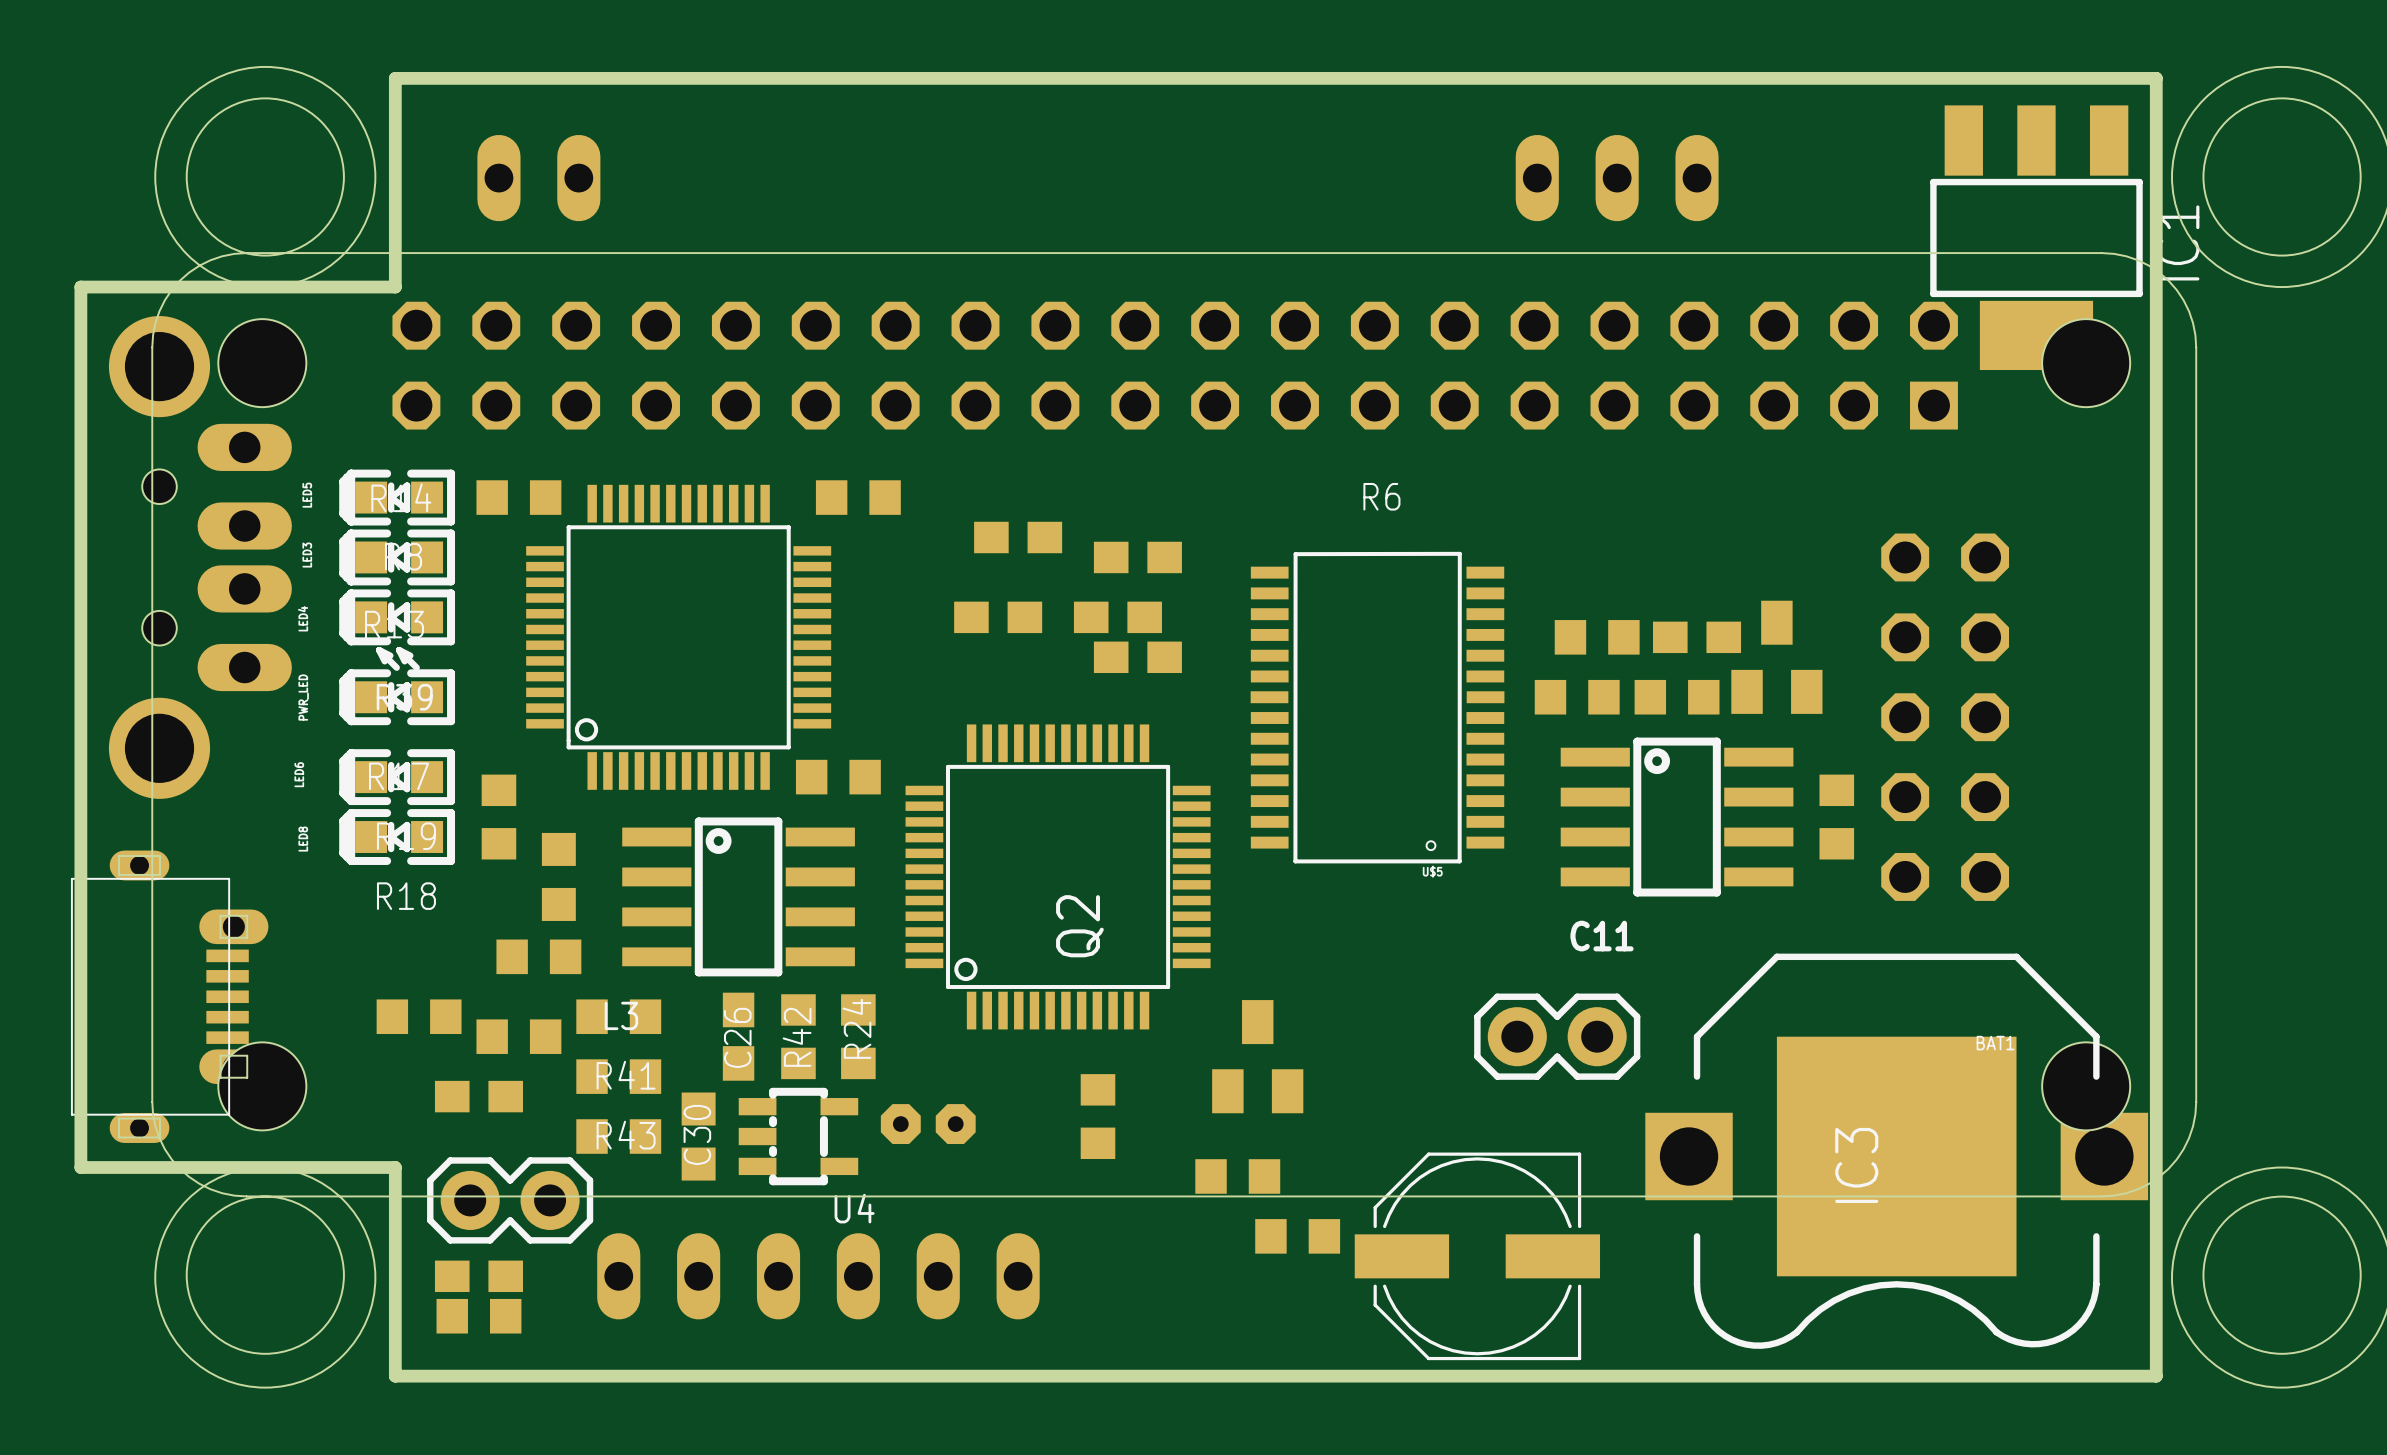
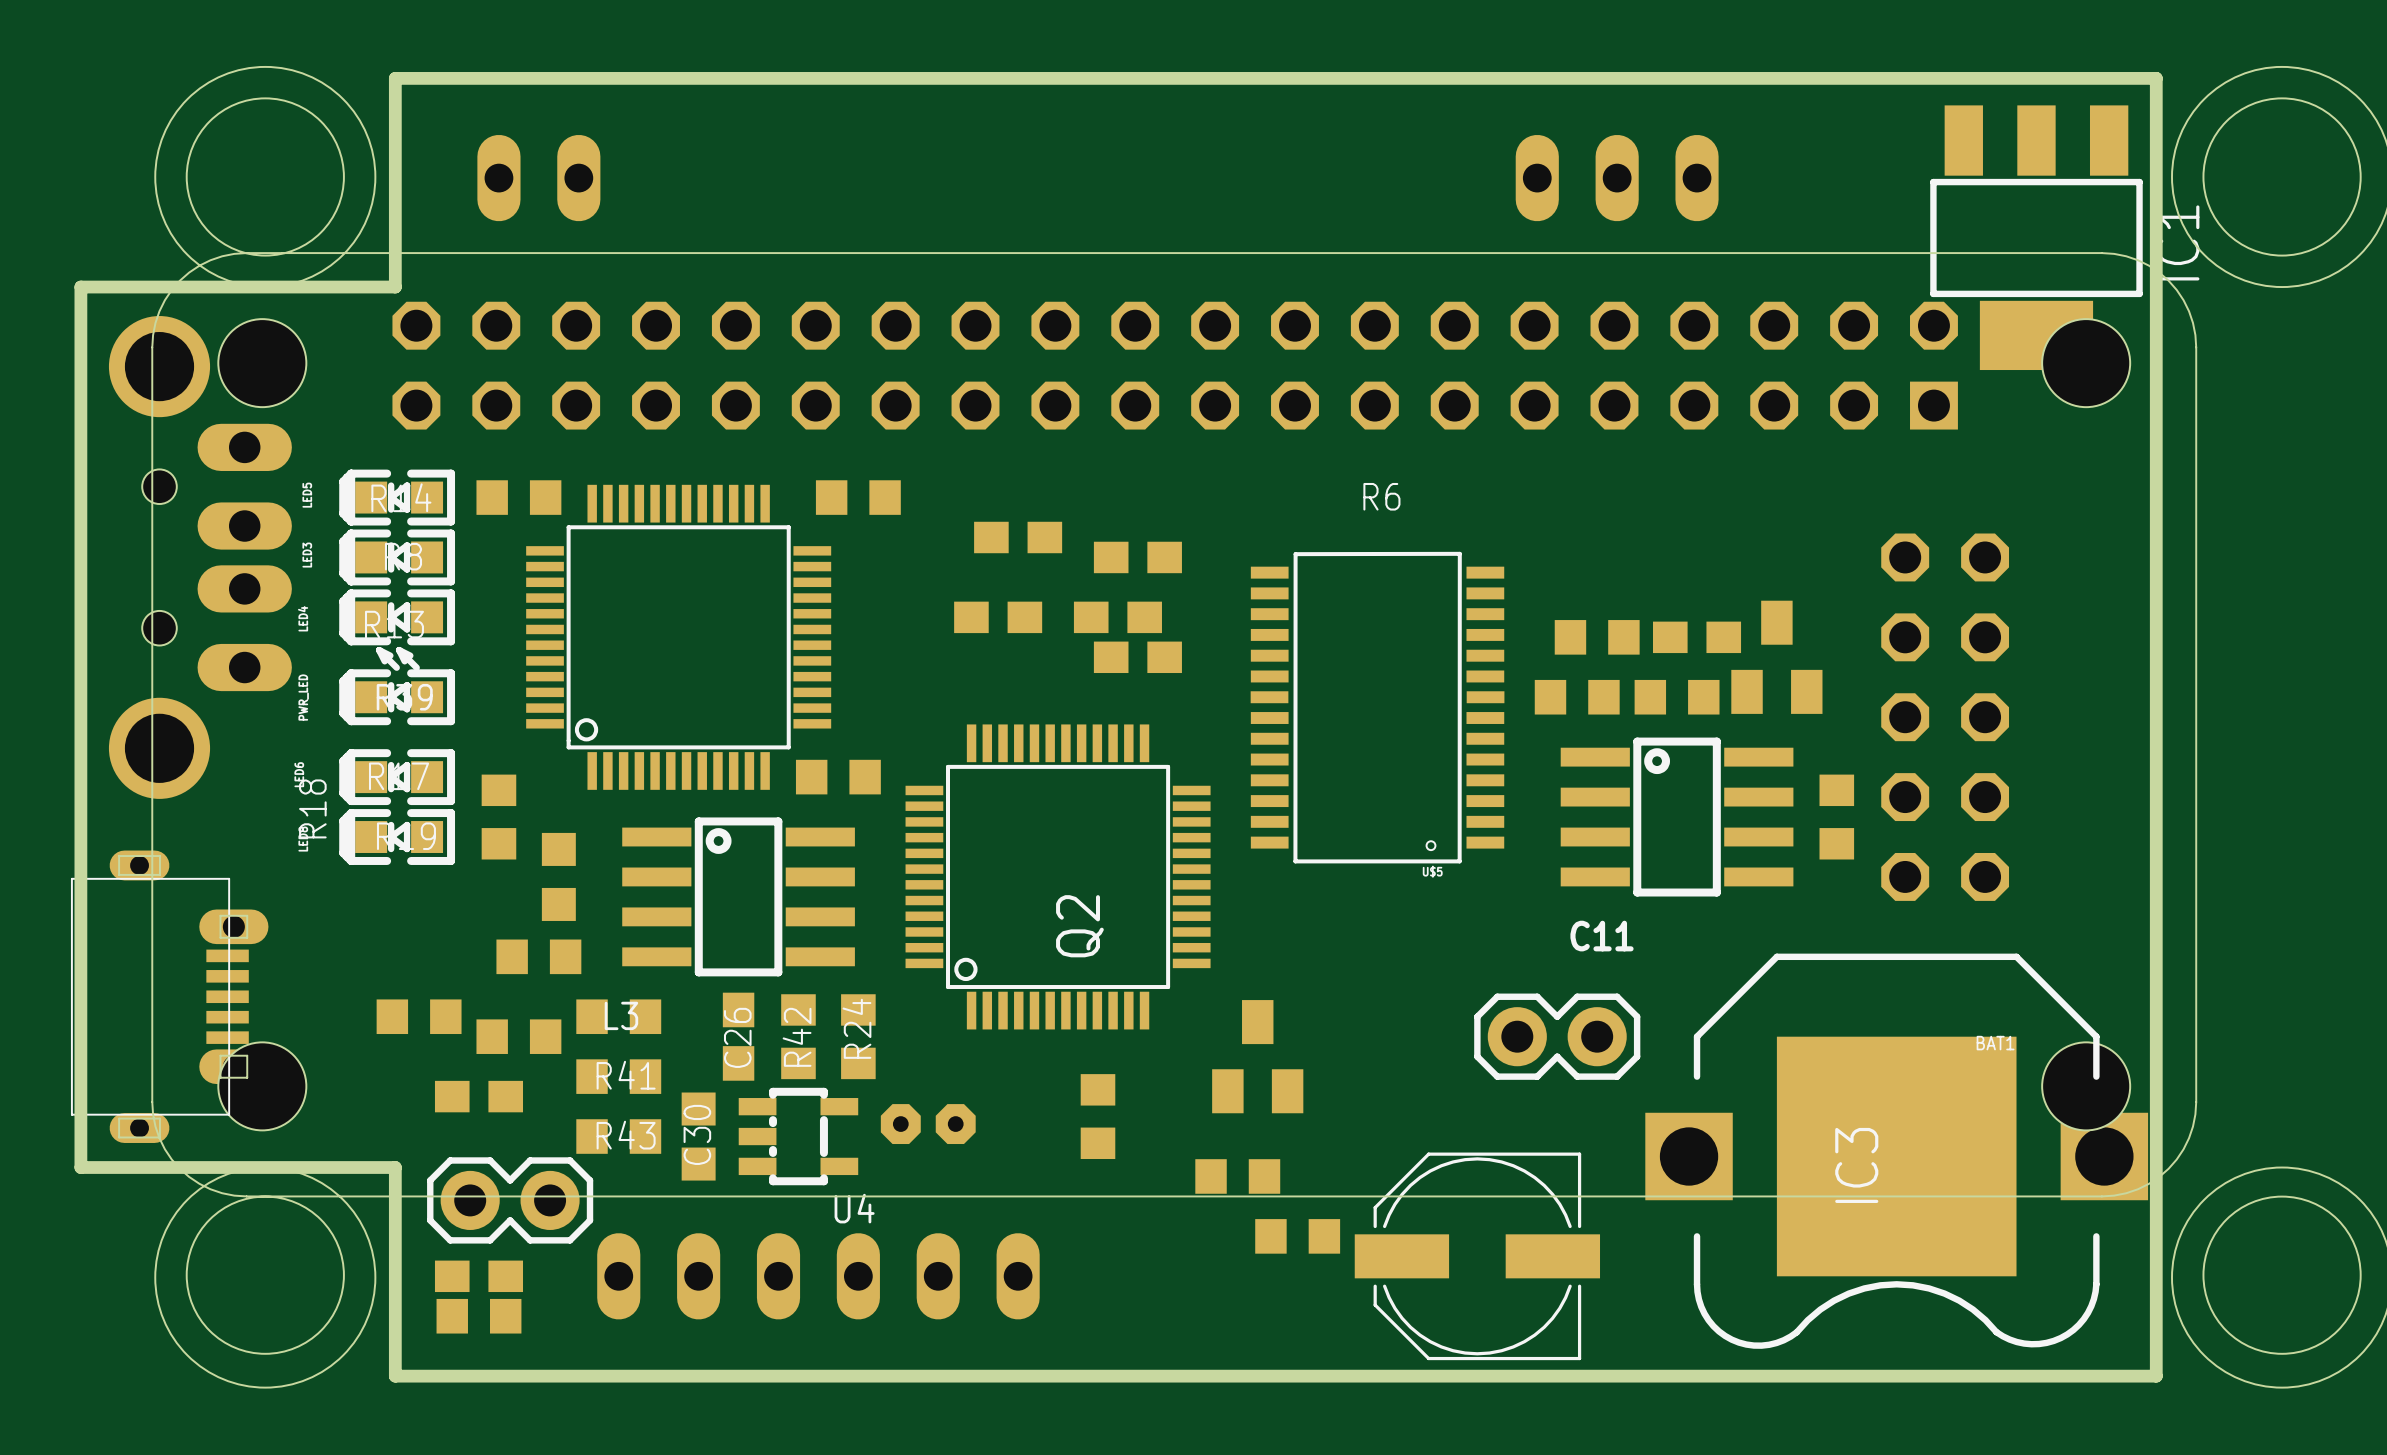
R18 position: (406, 896) -> (312, 808)
R18 name rotation: 0° (406, 896) -> 90° counterclockwise (312, 808)

